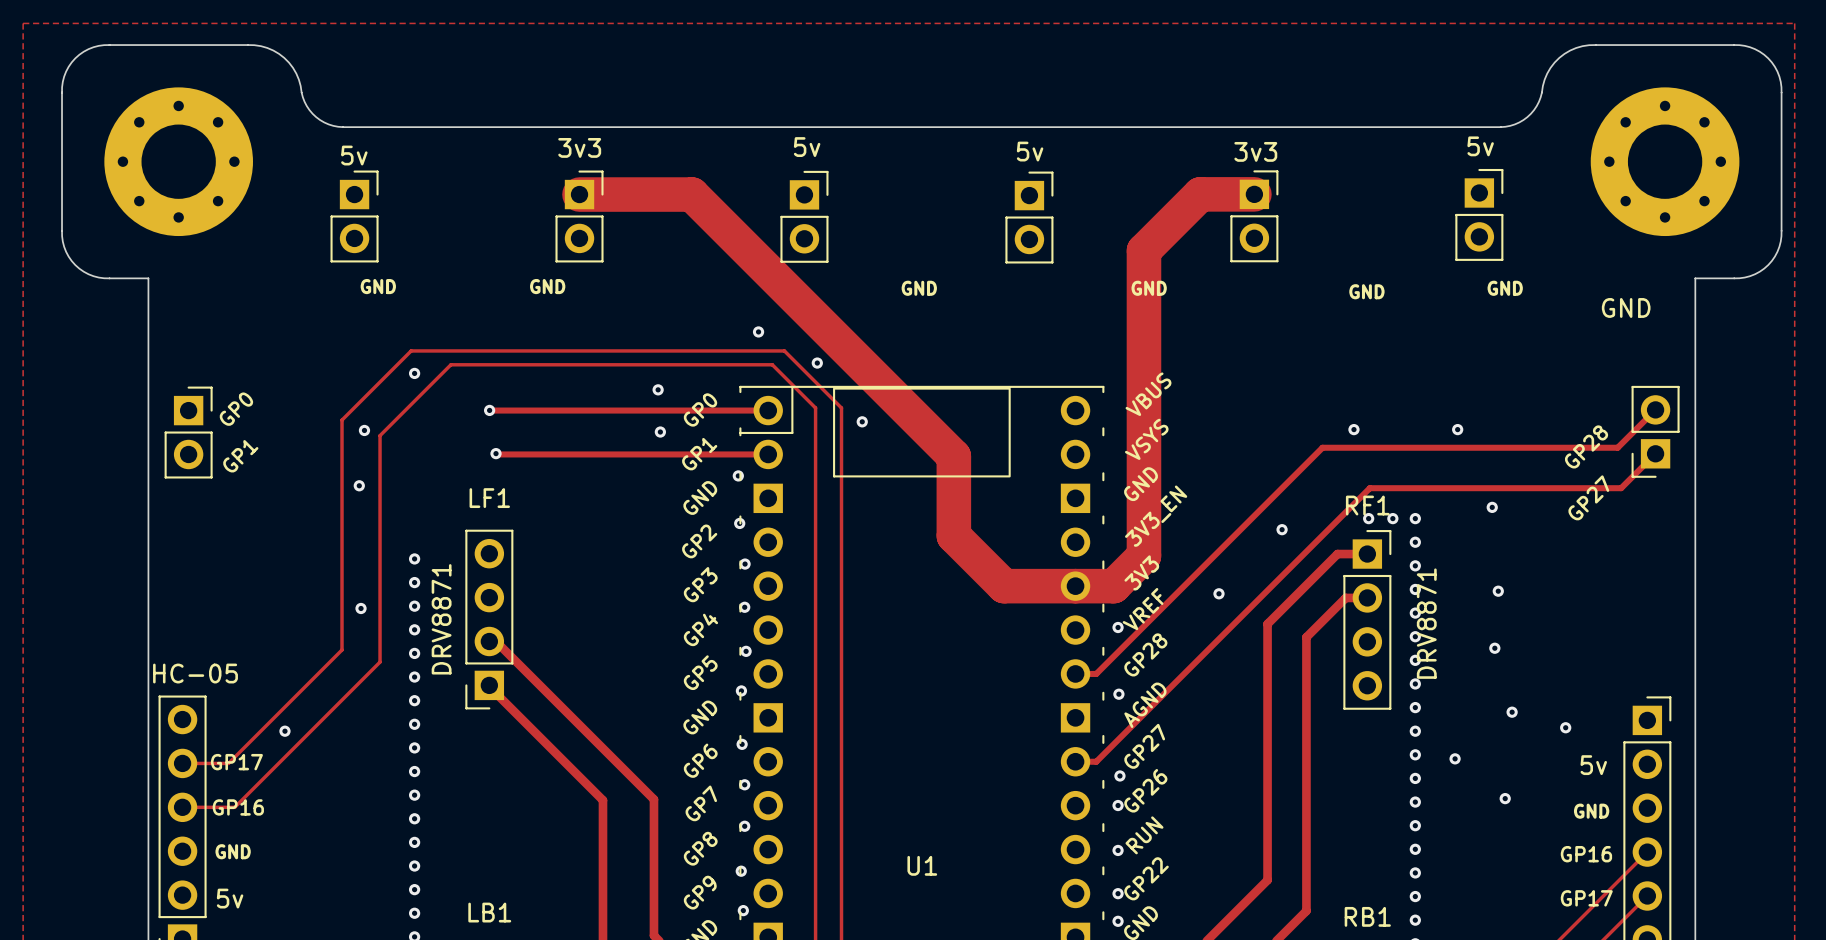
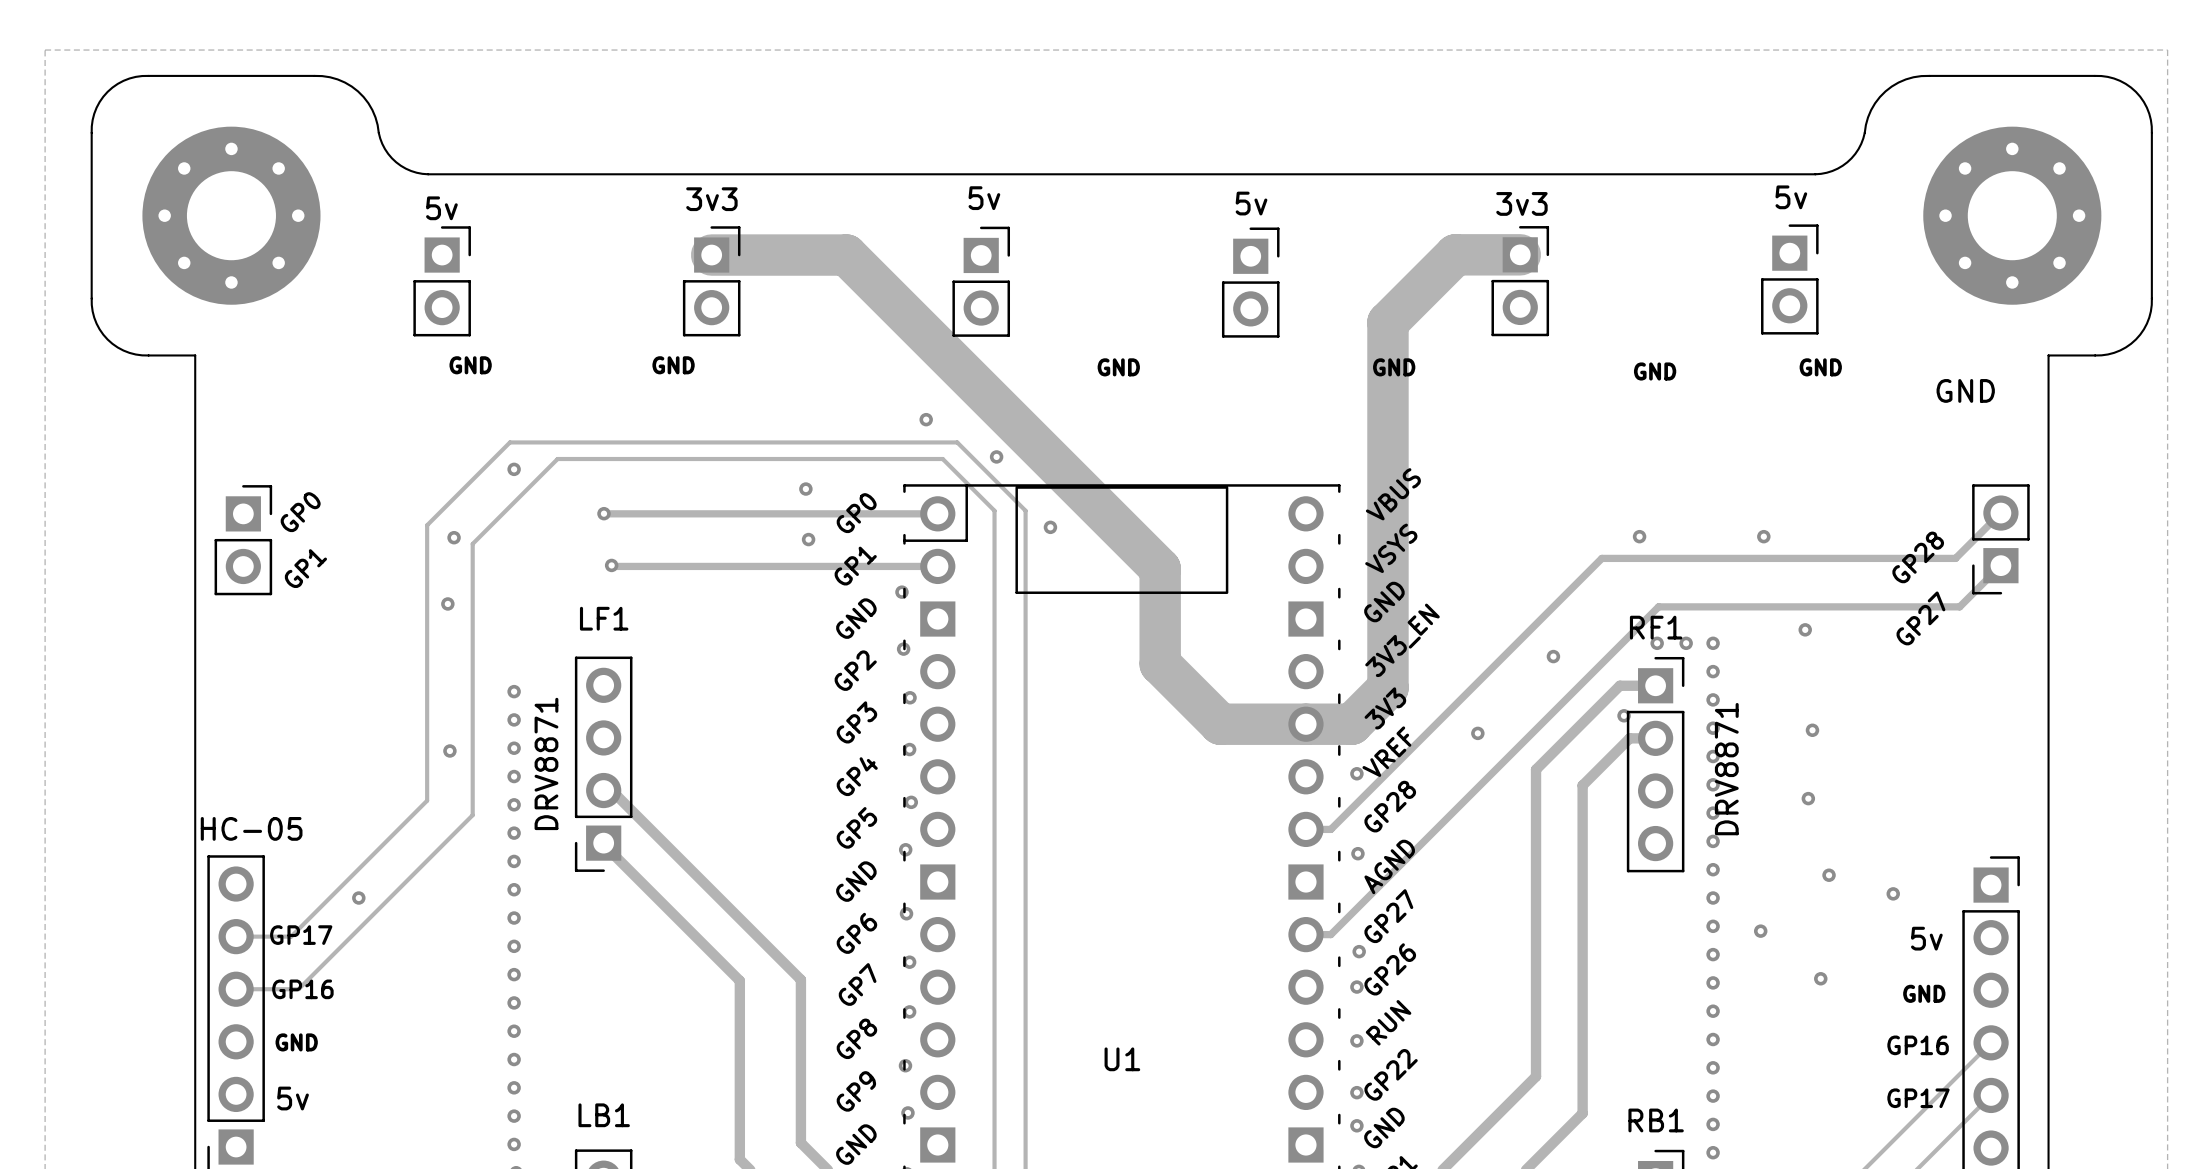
via: none -> (1624, 715)

